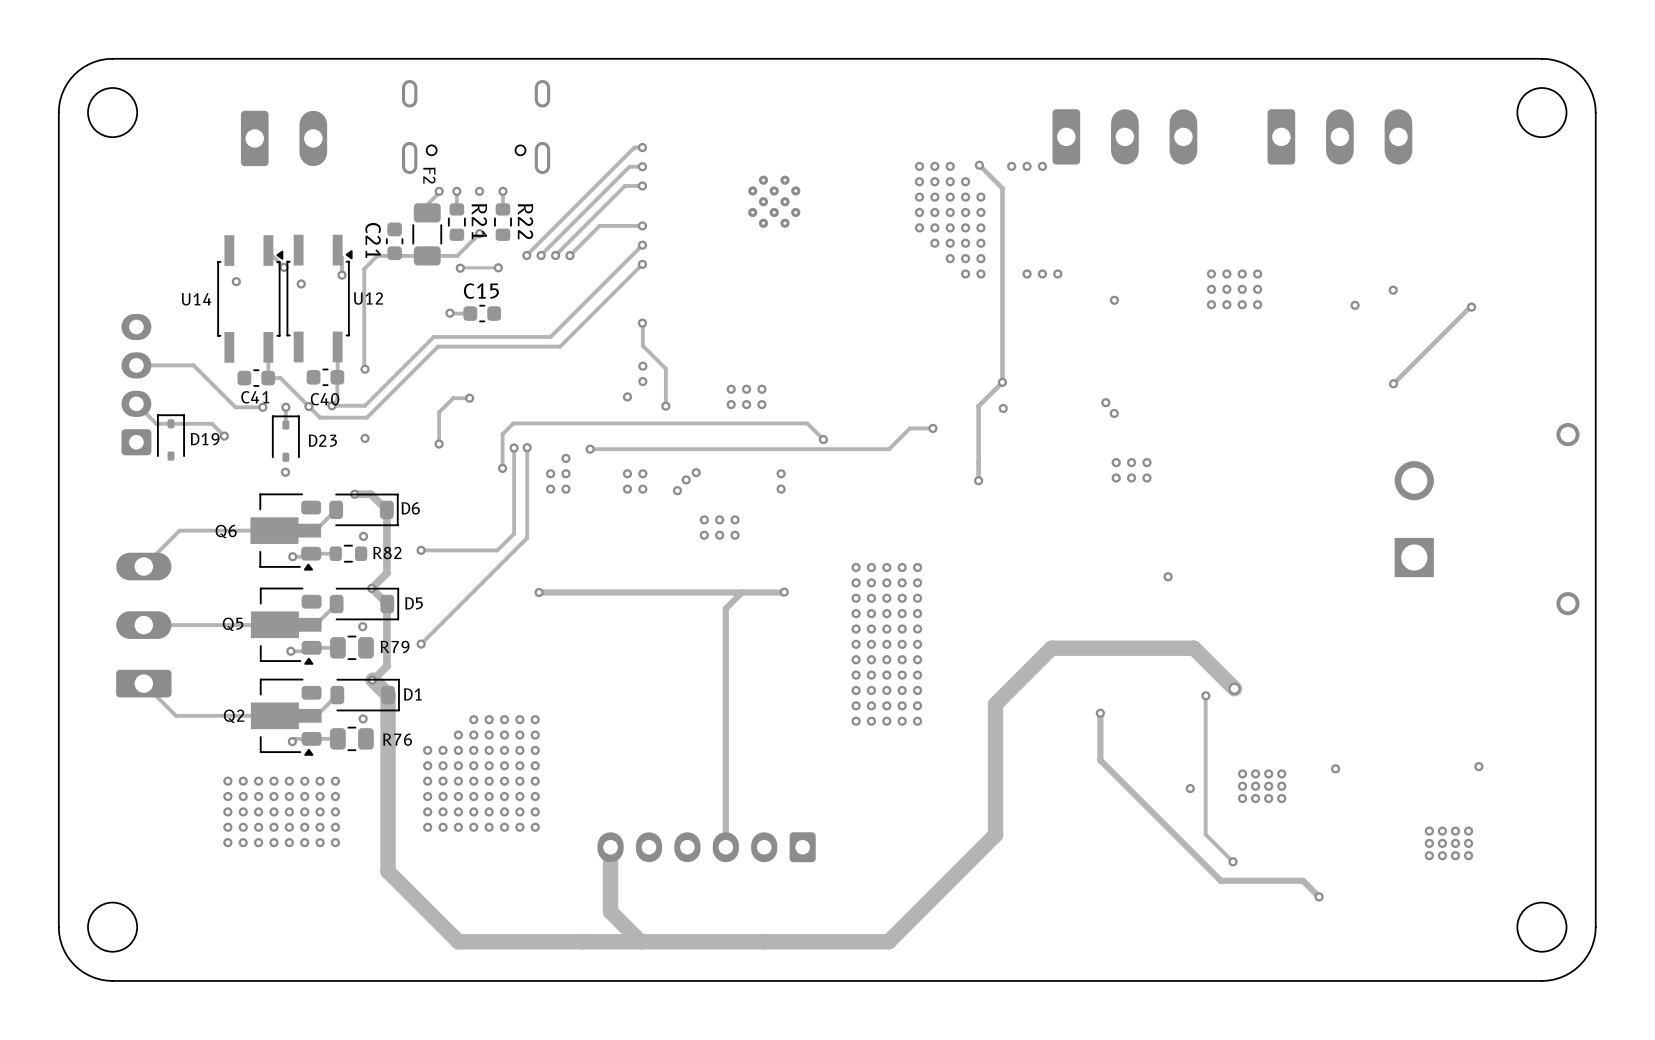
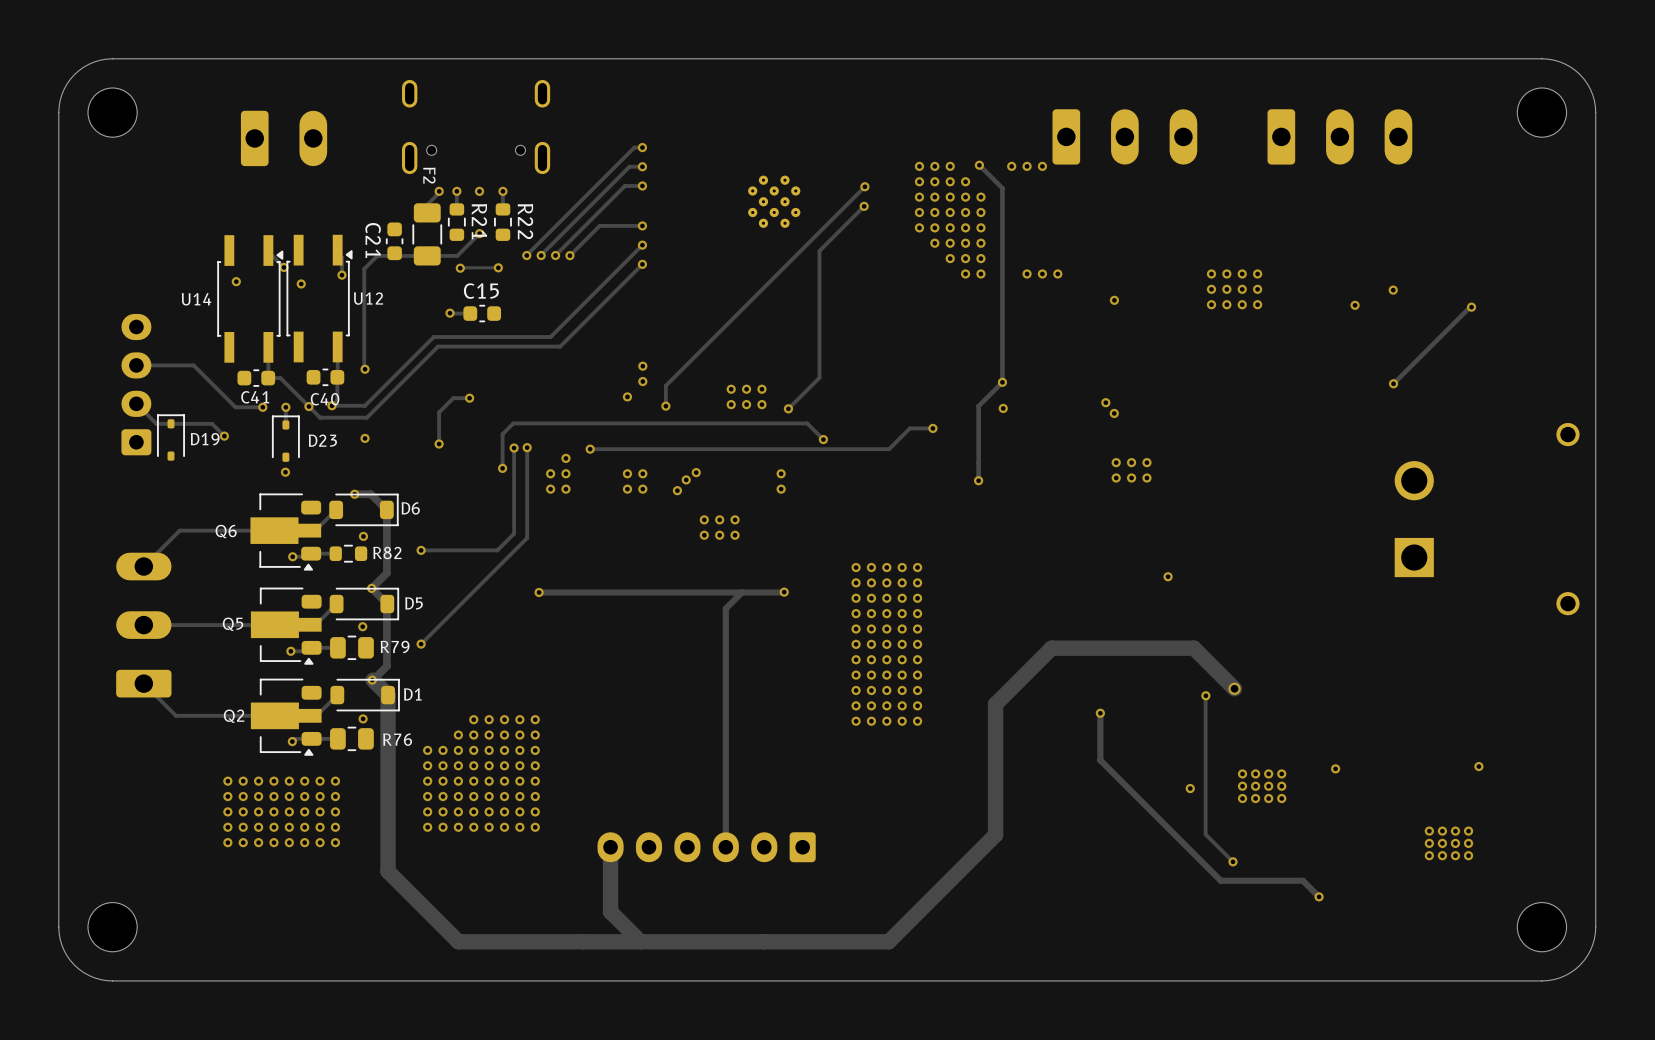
via: none -> (864, 186)
track: none -> (864, 206) (819, 250) (819, 377) (788, 408)
via: none -> (864, 206)
track: (642, 323) (642, 345) (665, 368) (665, 385) -> (864, 186) (665, 385)
via: (642, 323) -> none
via: none -> (788, 408)

